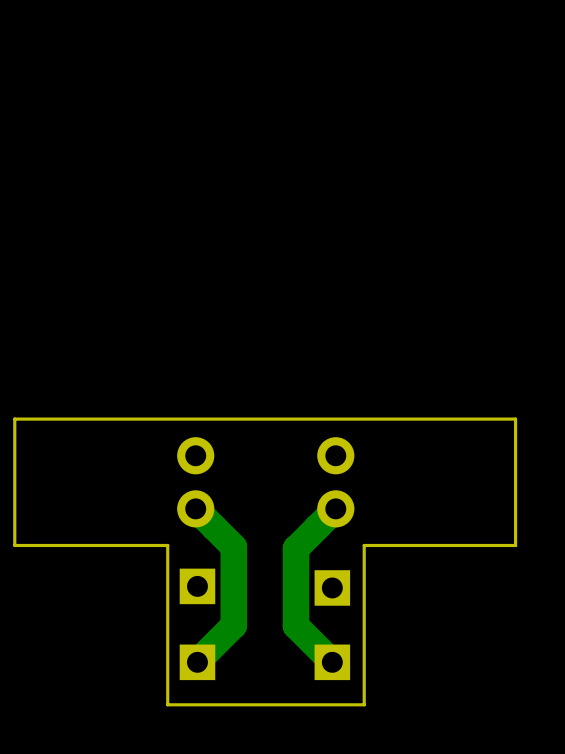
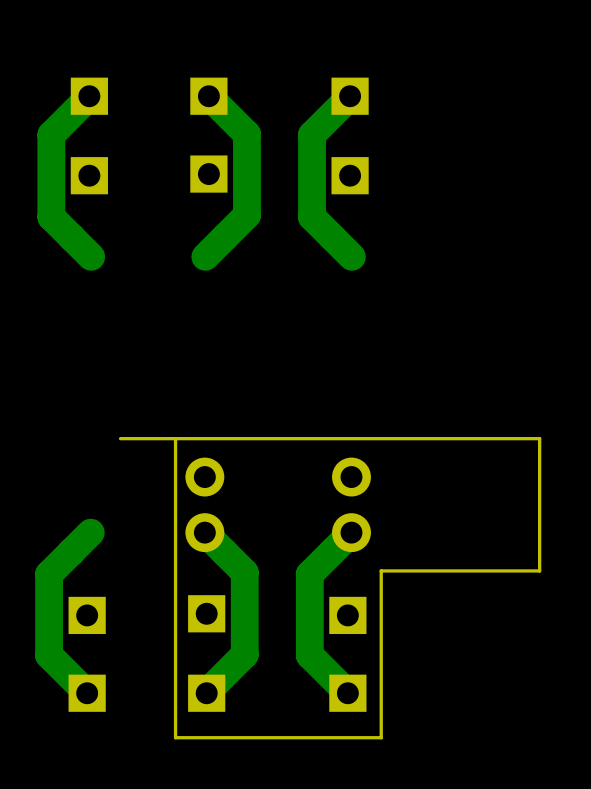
track: none -> (89, 96) (51, 134) (51, 216) (91, 256)
part: none -> (89, 96)
track: none -> (208, 96) (246, 134) (246, 215) (205, 256)
part: none -> (208, 96)
track: none -> (350, 96) (312, 134) (312, 216) (351, 256)
part: none -> (350, 96)
part: none -> (208, 174)
part: none -> (89, 175)
part: none -> (350, 175)
board edge: (115, 419) (14, 419) (14, 545) (167, 545) -> (175, 438) (175, 570)
track: none -> (90, 532) (49, 574) (49, 655) (87, 693)
part: none -> (87, 615)
part: none -> (87, 693)

